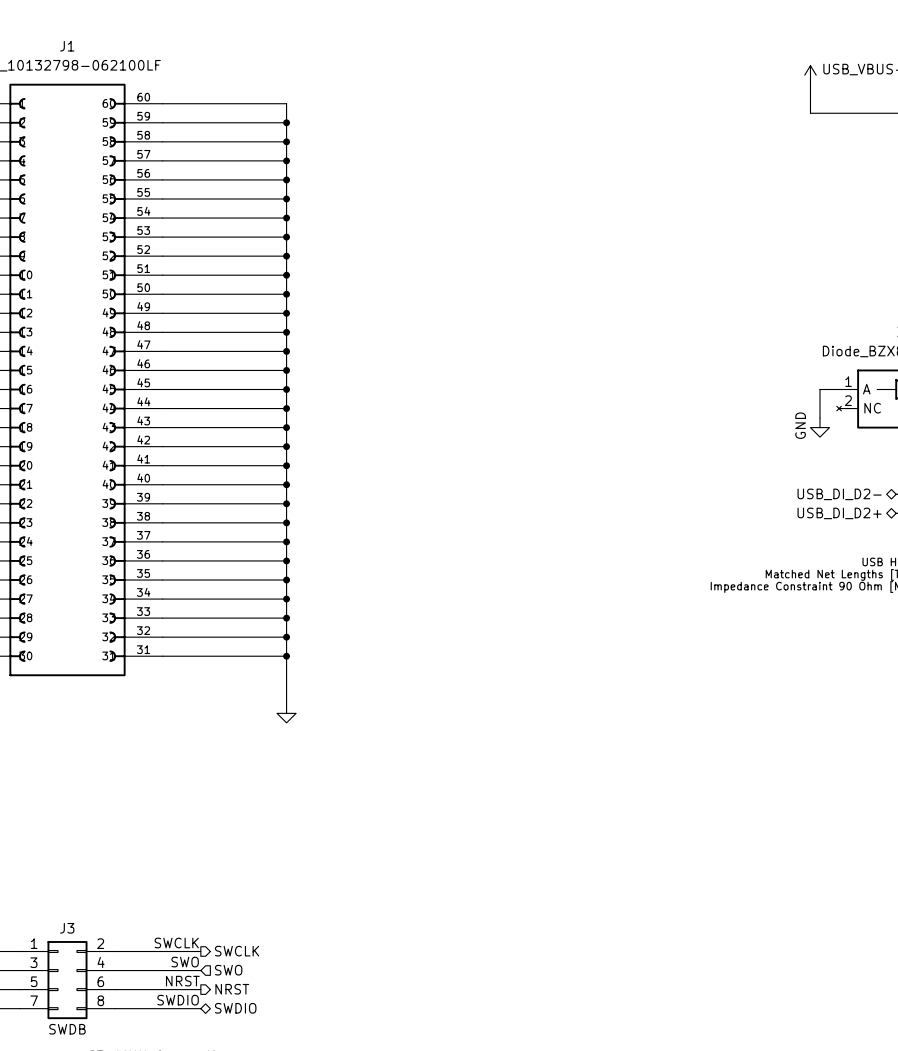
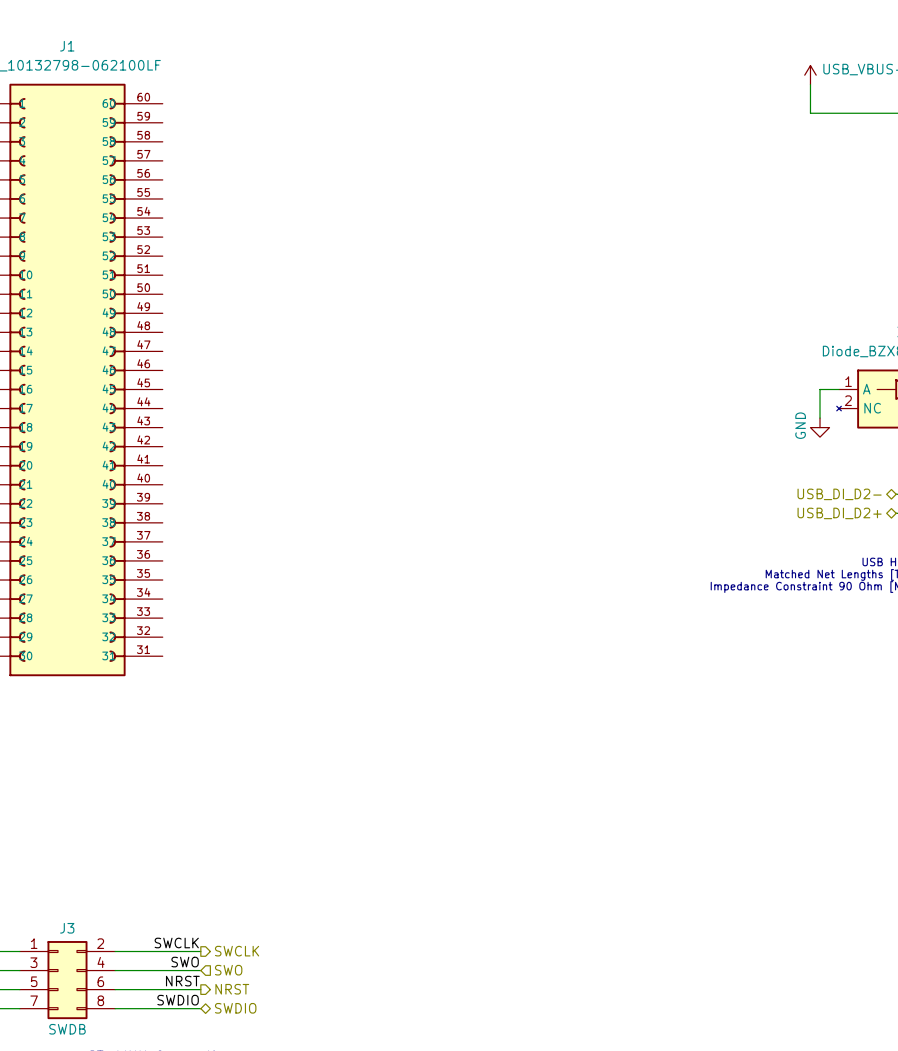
wire: (162, 103) (286, 103) (286, 703) -> none
wire: (162, 122) (286, 122) -> none
junction: (286, 122) -> none
wire: (162, 141) (286, 141) -> none
junction: (286, 141) -> none
wire: (162, 160) (286, 160) -> none
junction: (286, 160) -> none
wire: (162, 179) (286, 179) -> none
junction: (286, 179) -> none
wire: (162, 198) (286, 198) -> none
junction: (286, 198) -> none
wire: (162, 218) (286, 218) -> none
junction: (286, 218) -> none
wire: (162, 237) (286, 237) -> none
junction: (286, 237) -> none
wire: (162, 256) (286, 256) -> none
junction: (286, 256) -> none
wire: (162, 275) (286, 275) -> none
junction: (286, 275) -> none
wire: (162, 294) (286, 294) -> none
junction: (286, 294) -> none
wire: (162, 313) (286, 313) -> none
junction: (286, 313) -> none
wire: (162, 332) (286, 332) -> none
junction: (286, 332) -> none
wire: (162, 351) (286, 351) -> none
junction: (286, 351) -> none
wire: (162, 370) (286, 370) -> none
junction: (286, 370) -> none
wire: (162, 389) (286, 389) -> none
junction: (286, 389) -> none
wire: (162, 408) (286, 408) -> none
junction: (286, 408) -> none
wire: (162, 427) (286, 427) -> none
junction: (286, 427) -> none
wire: (162, 446) (286, 446) -> none
junction: (286, 446) -> none
wire: (162, 465) (286, 465) -> none
junction: (286, 465) -> none
wire: (162, 484) (286, 484) -> none
junction: (286, 484) -> none
wire: (162, 503) (286, 503) -> none
junction: (286, 503) -> none
wire: (162, 522) (286, 522) -> none
junction: (286, 522) -> none
wire: (162, 541) (286, 541) -> none
junction: (286, 541) -> none
wire: (162, 560) (286, 560) -> none
junction: (286, 560) -> none
wire: (162, 580) (286, 580) -> none
junction: (286, 580) -> none
wire: (162, 599) (286, 599) -> none
junction: (286, 599) -> none
wire: (162, 618) (286, 618) -> none
junction: (286, 618) -> none
wire: (162, 637) (286, 637) -> none
junction: (286, 637) -> none
wire: (162, 656) (286, 656) -> none
junction: (286, 656) -> none
power symbol: (286, 713) -> none

